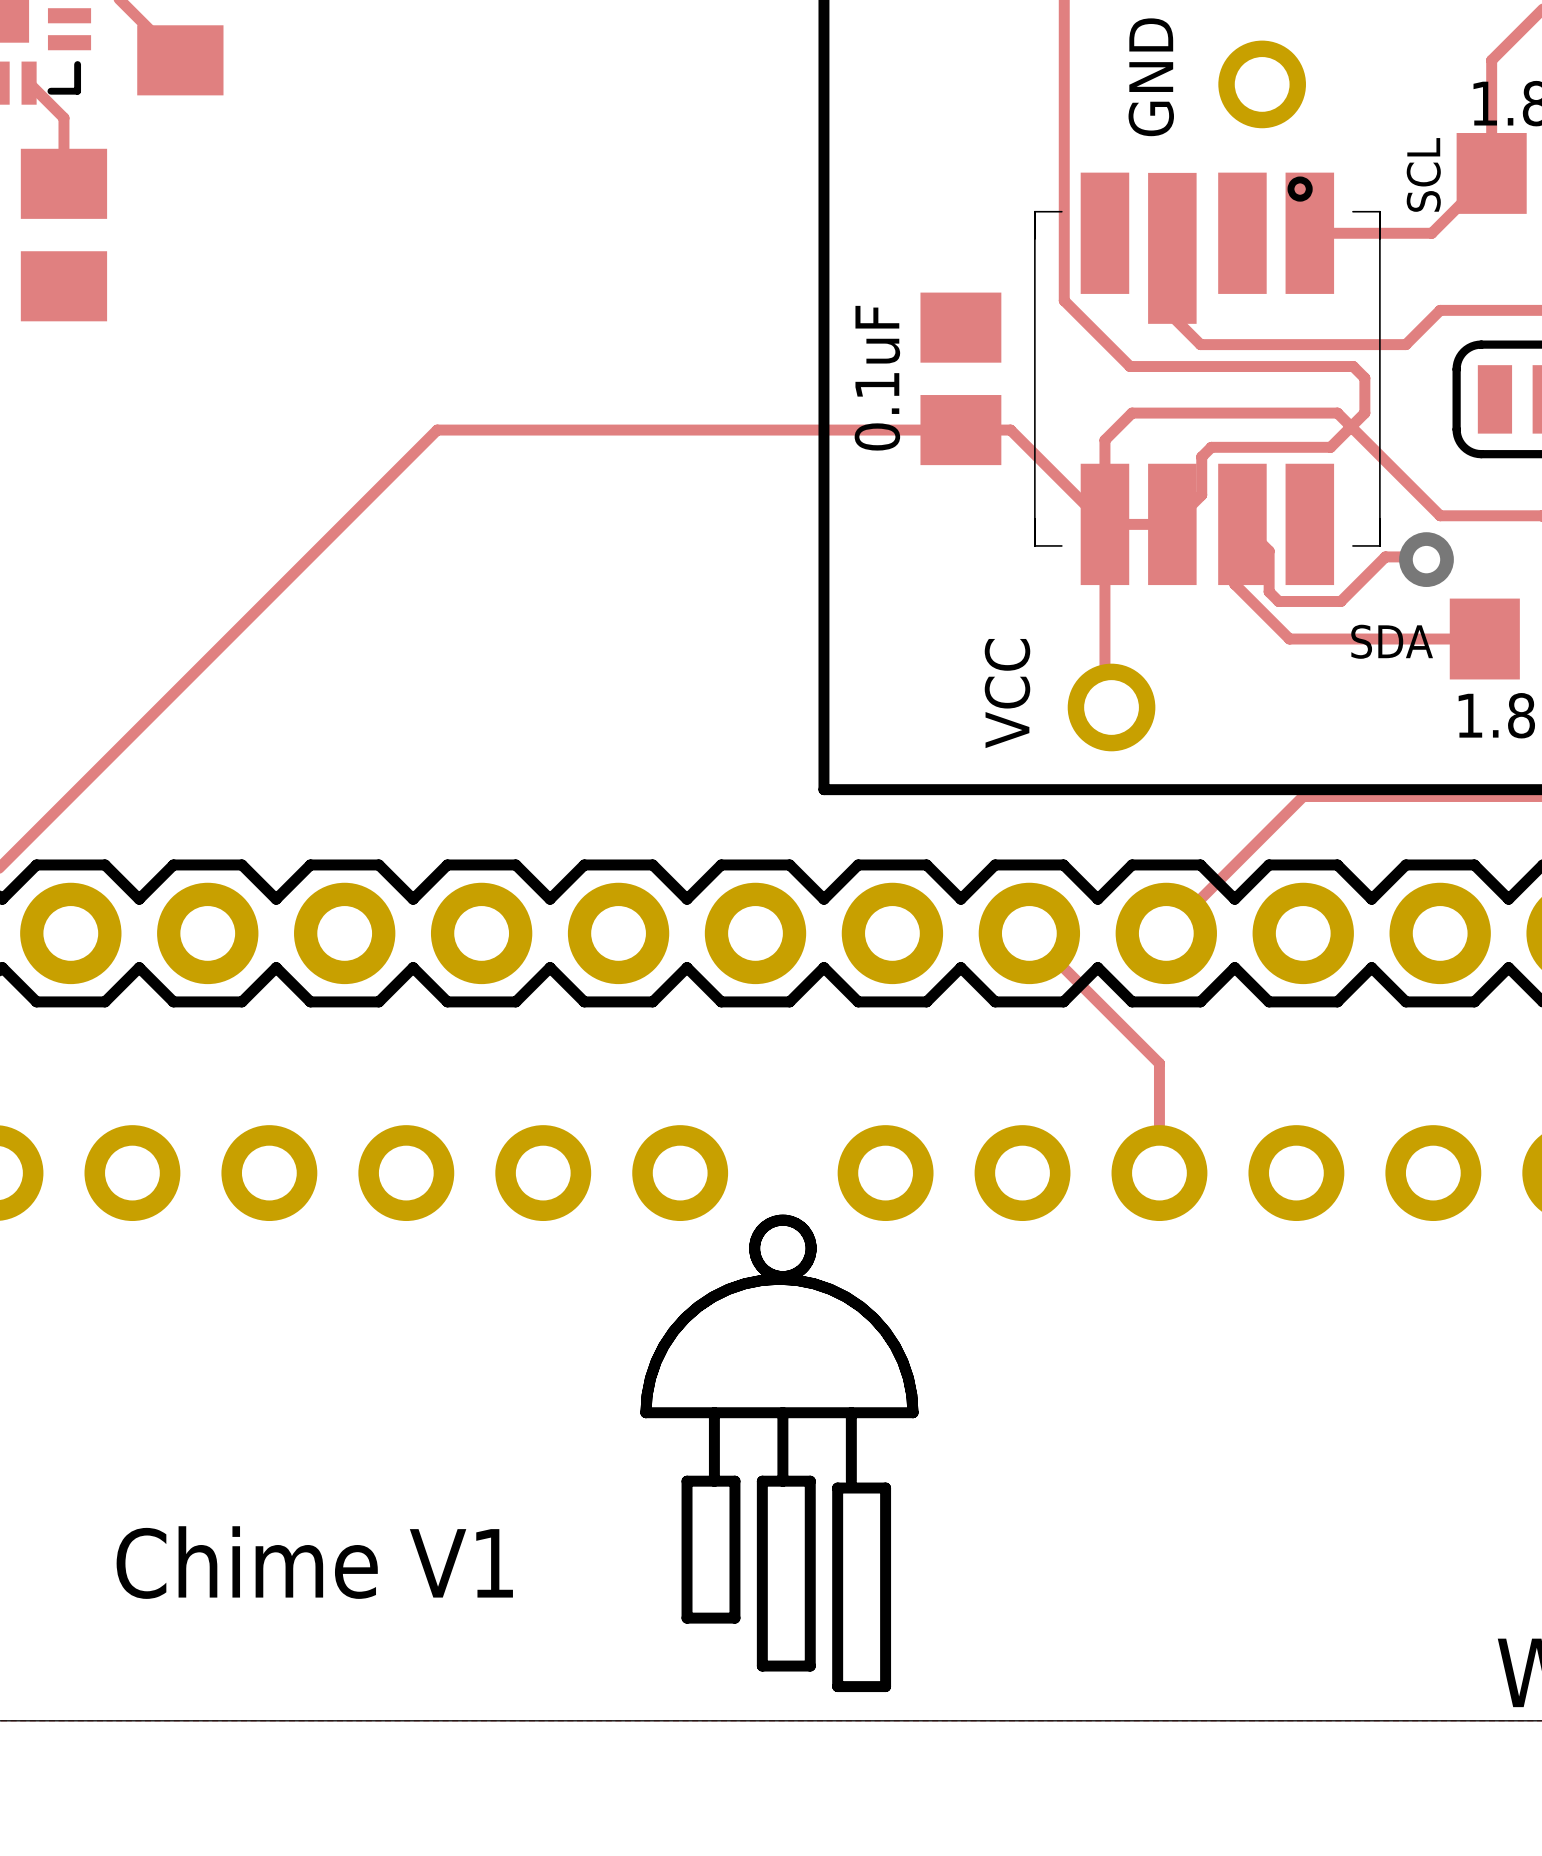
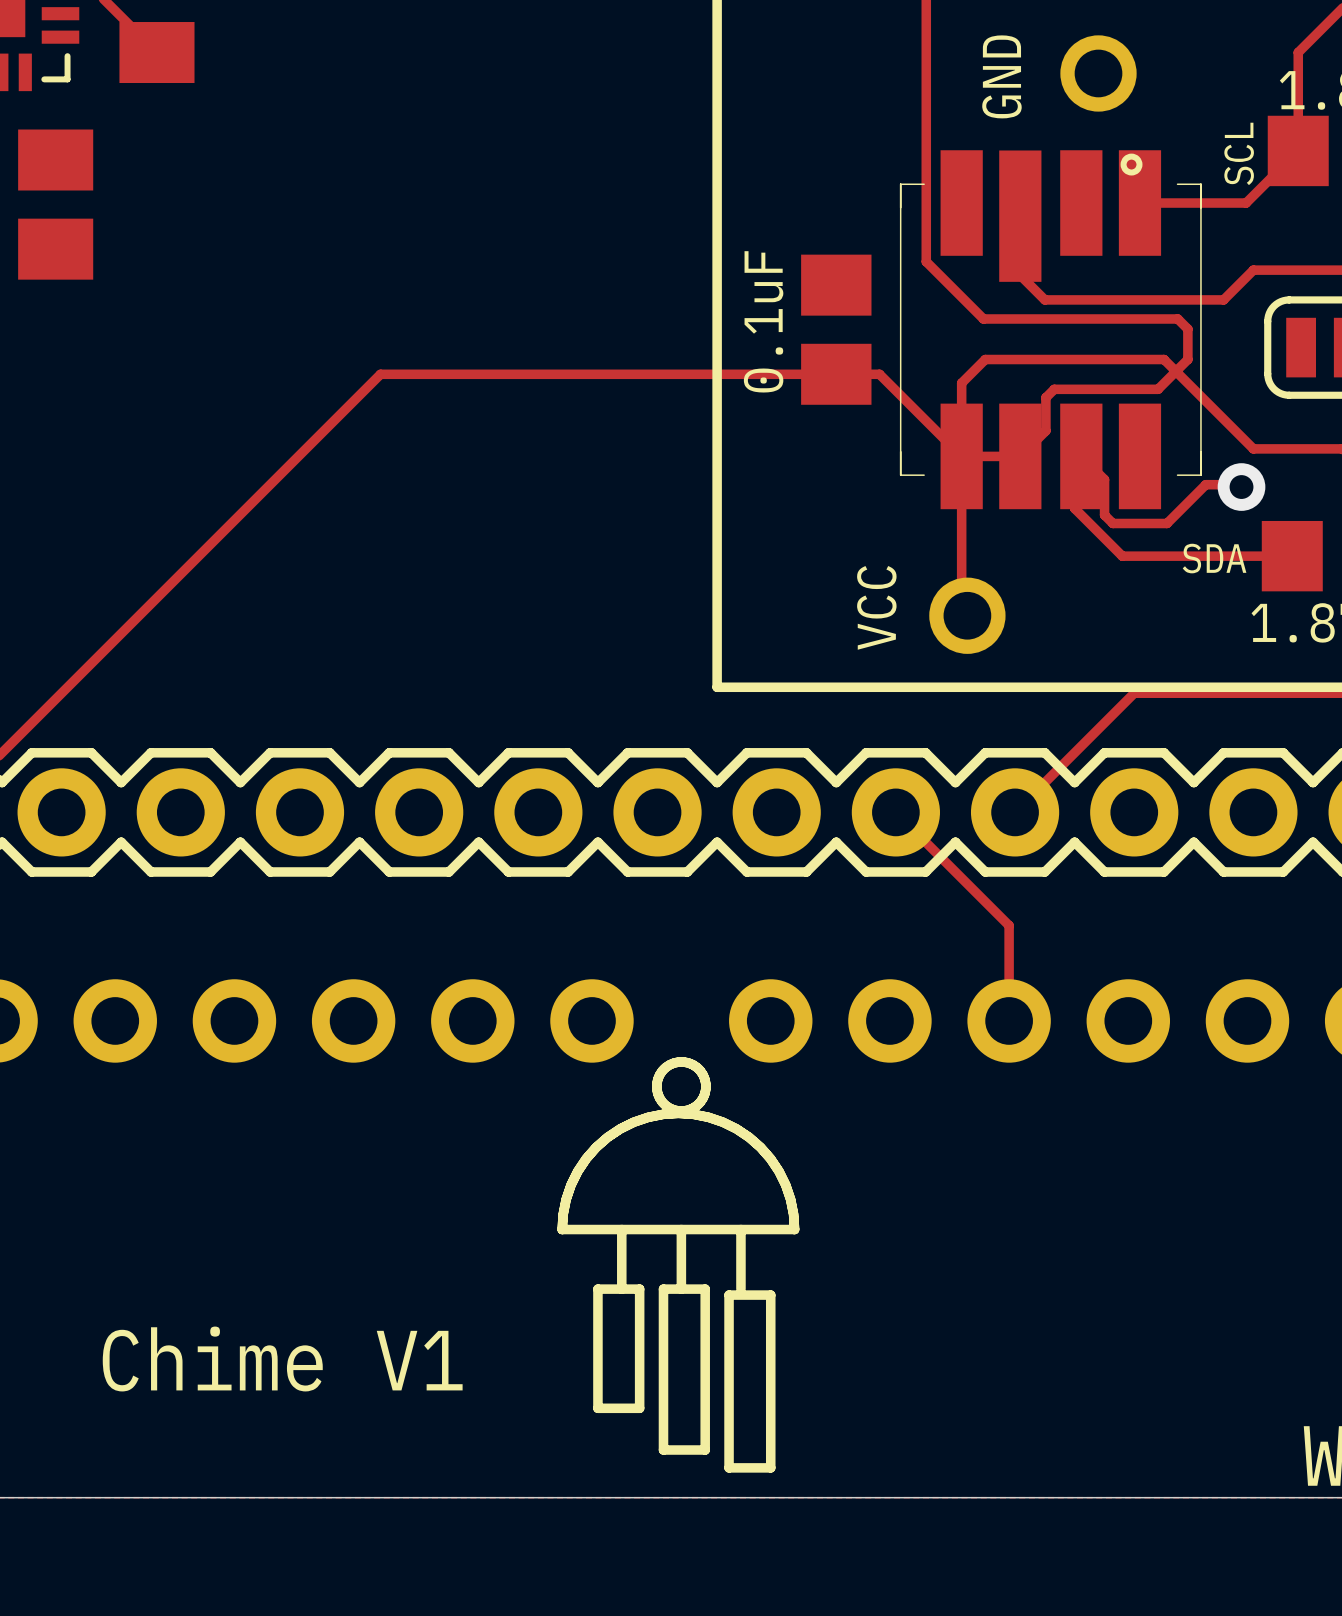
track: (29, 83) (63, 118) (63, 183) -> none

